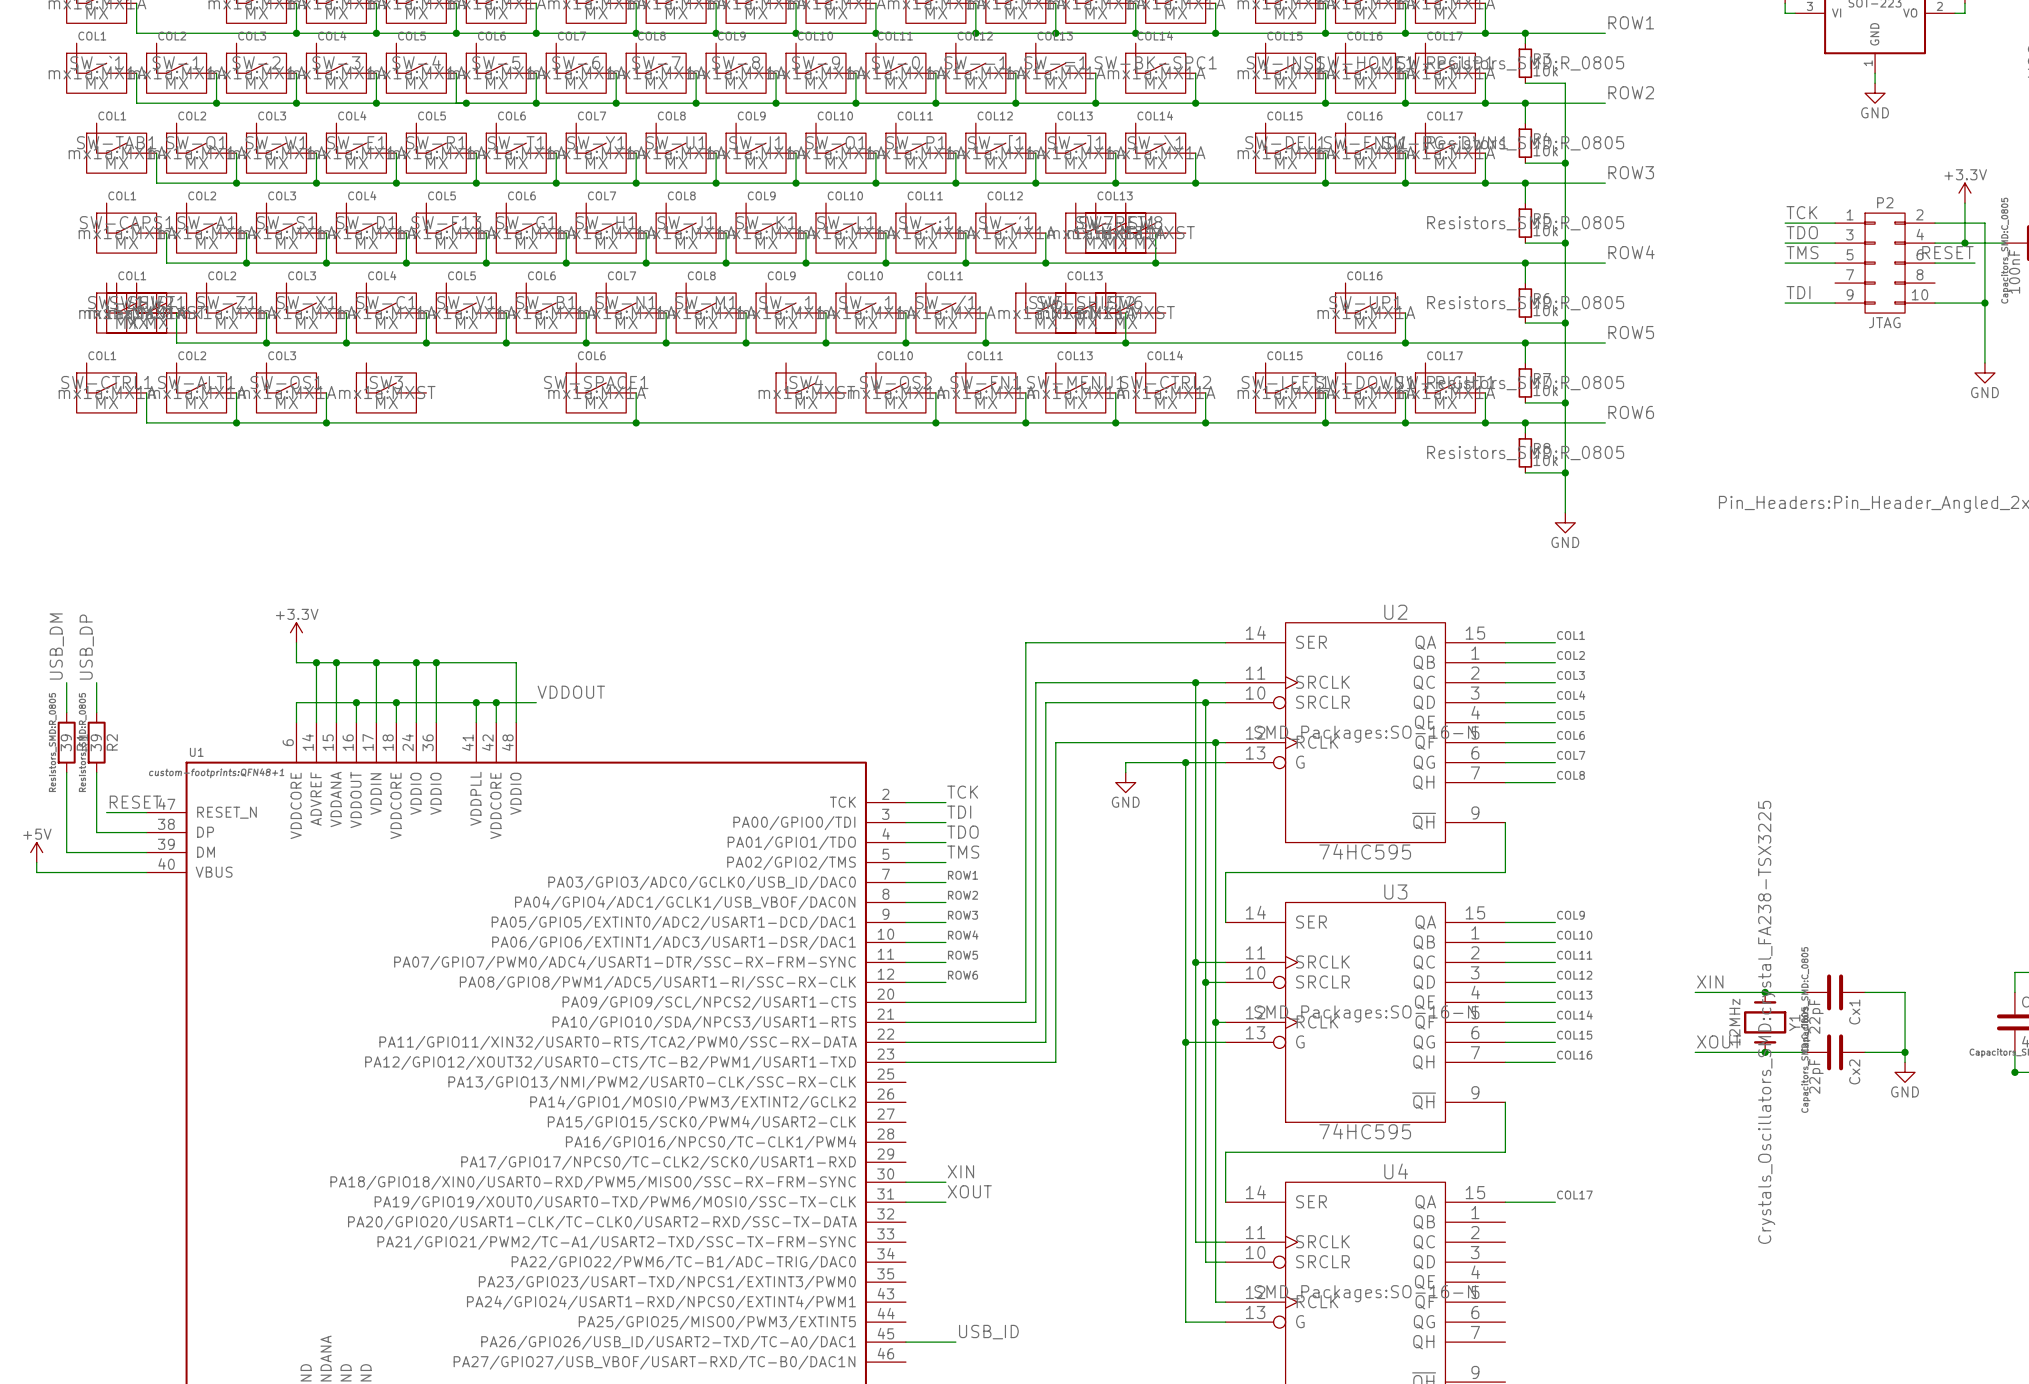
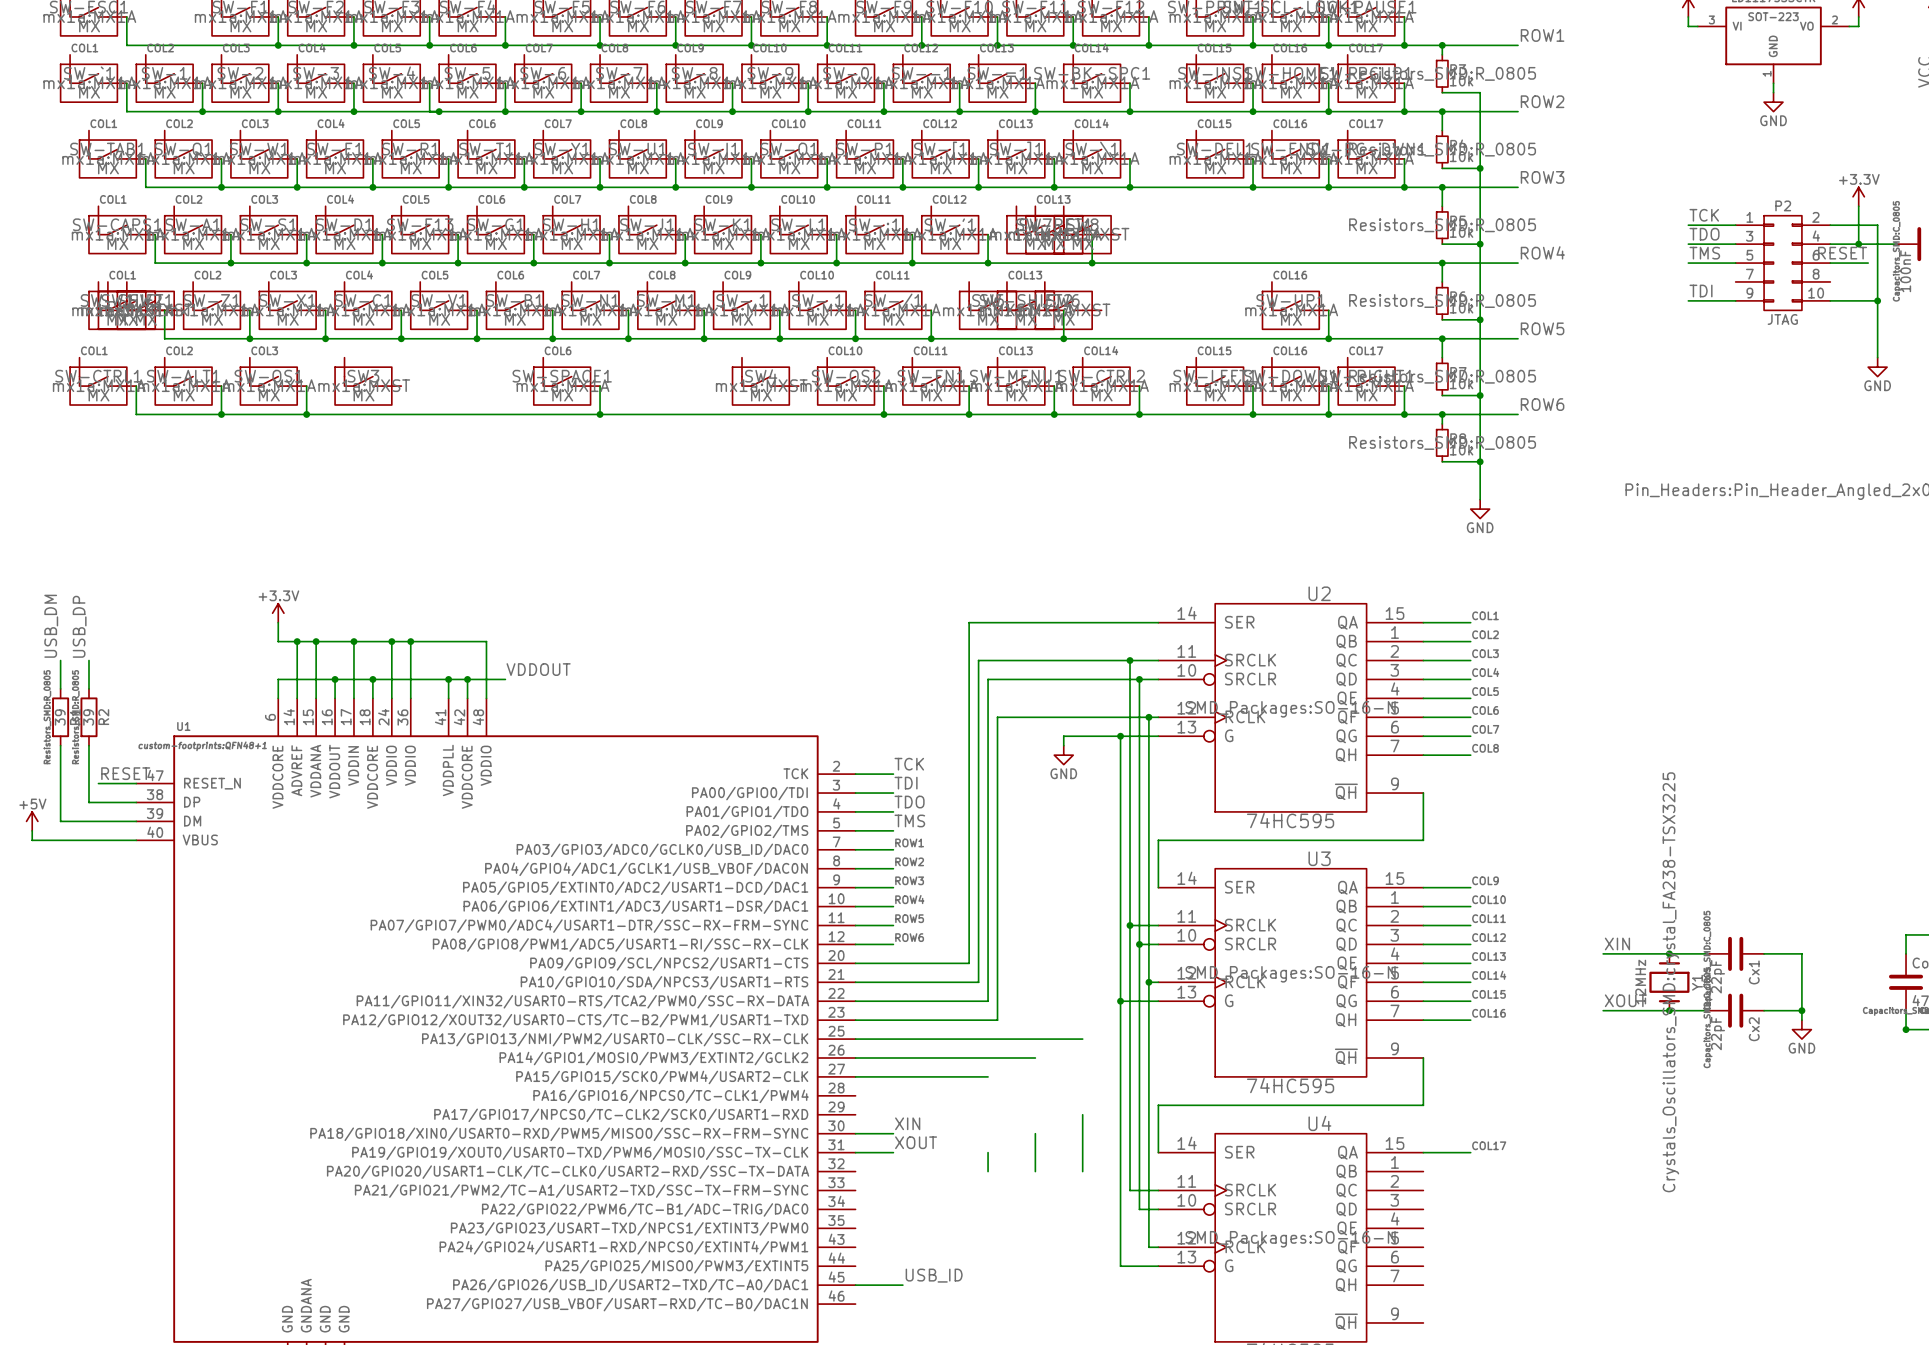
wire: none -> (855, 1039) (1082, 1039)
wire: none -> (855, 1058) (1035, 1058)
wire: none -> (855, 1076) (988, 1076)
wire: none -> (1082, 1114) (1082, 1171)
wire: none -> (1035, 1133) (1035, 1171)
wire: none -> (988, 1152) (988, 1171)

